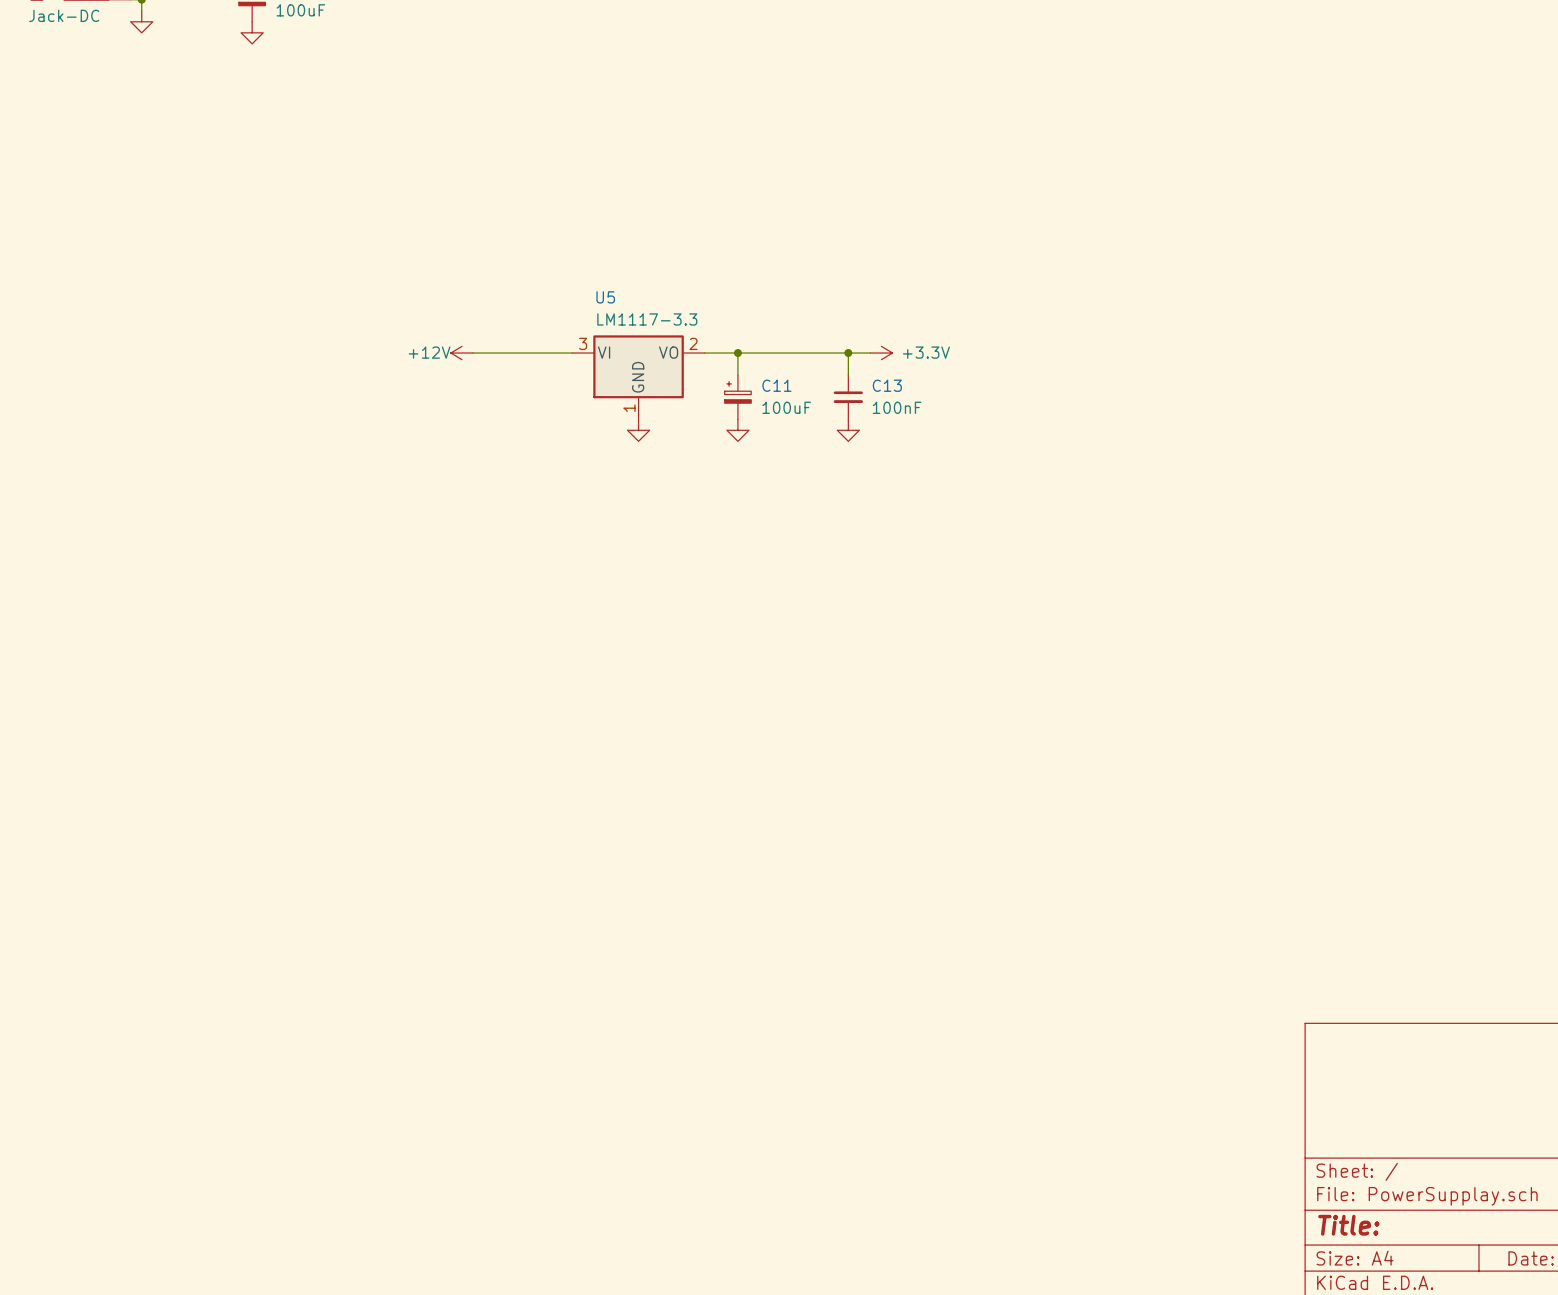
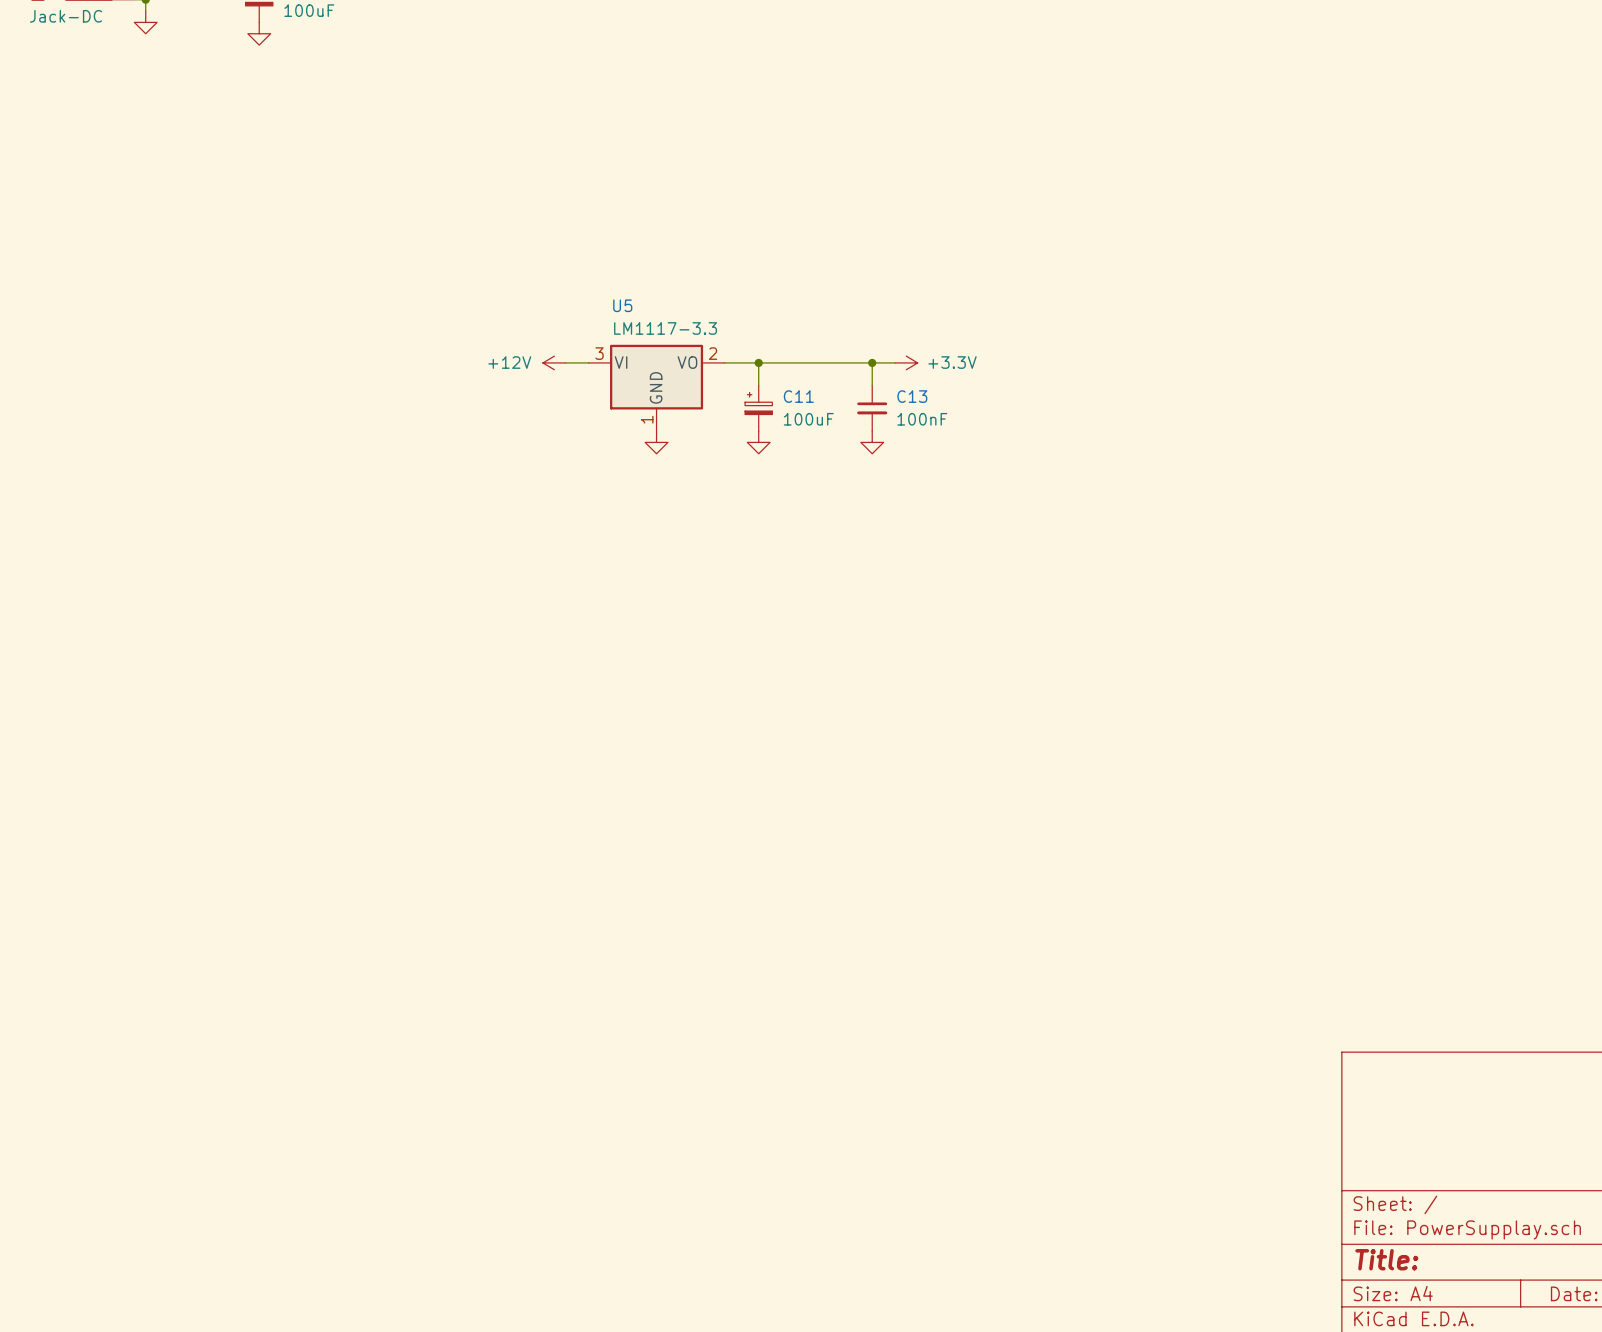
power symbol text position: +12V (429, 352) -> +12V (509, 362)
power symbol position: +12V (461, 353) -> +12V (554, 362)
wire: (472, 353) (550, 353) -> none

